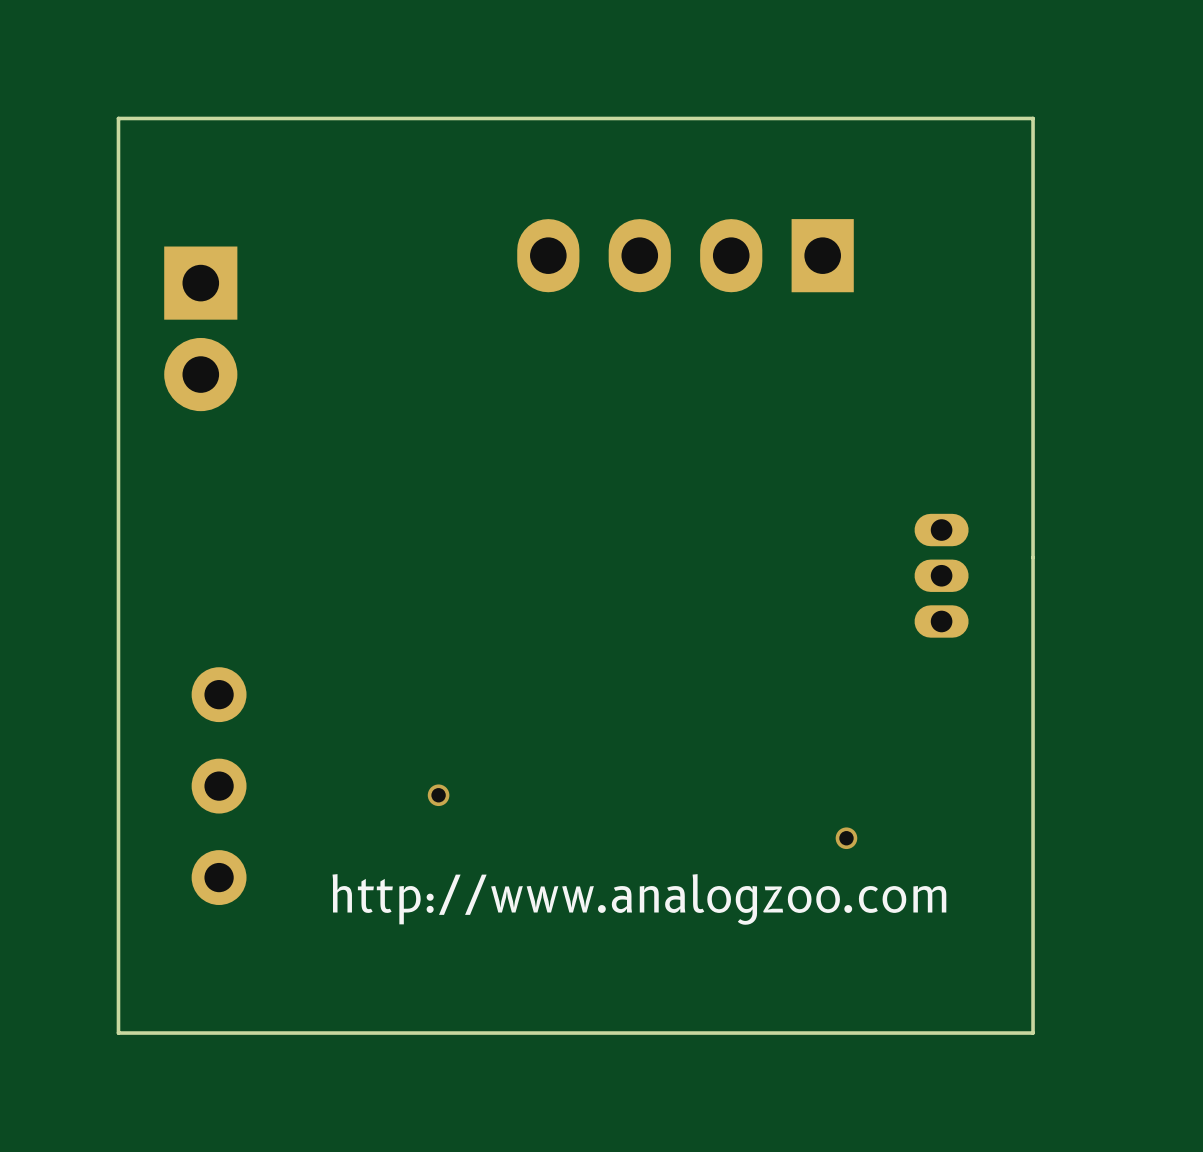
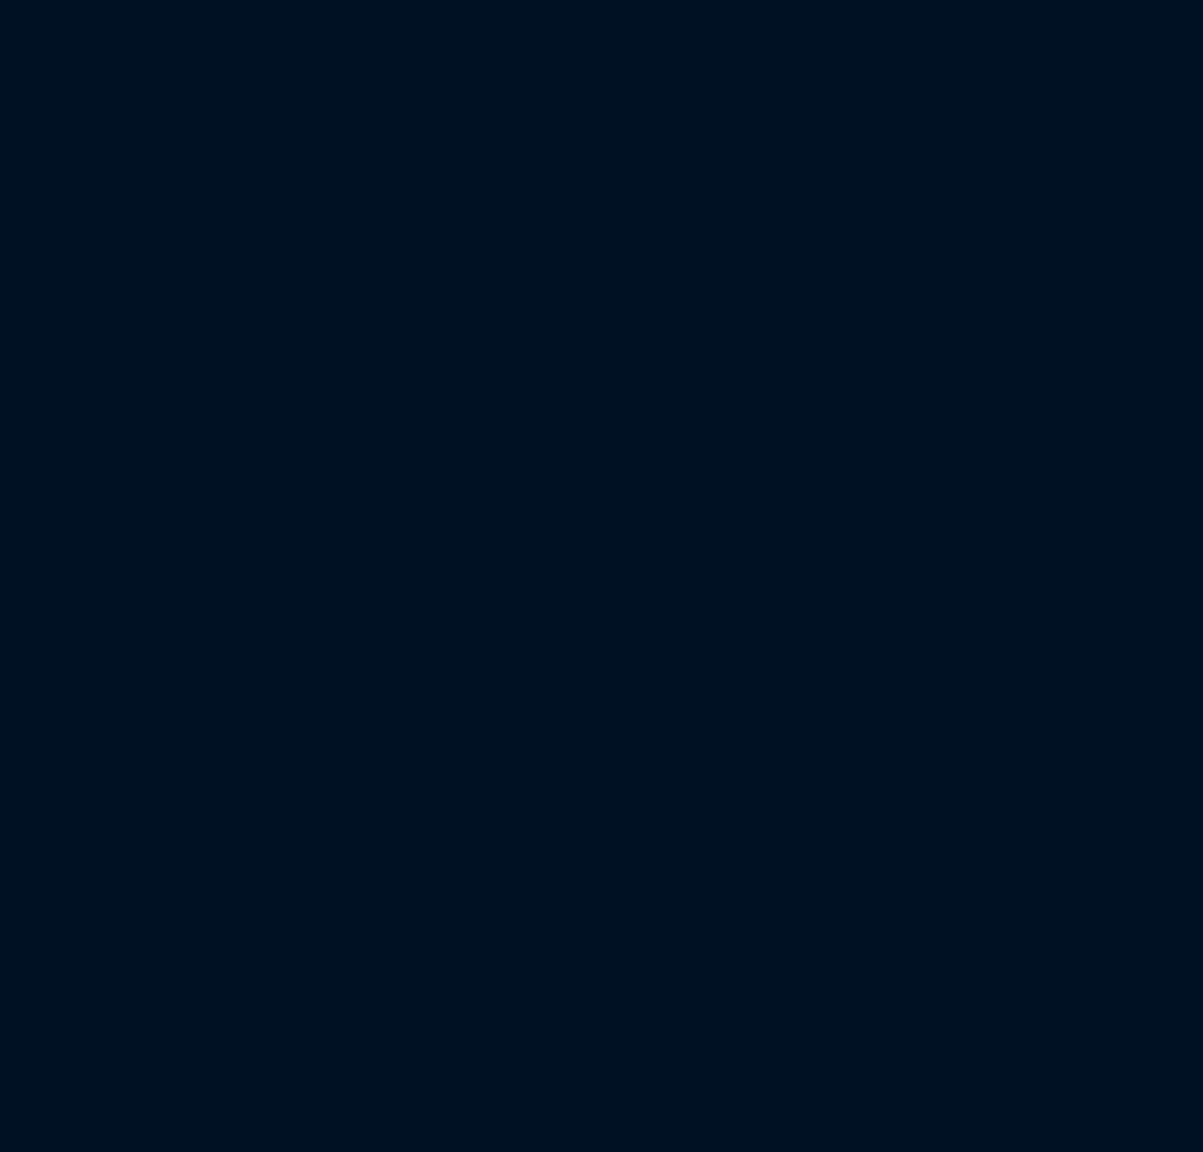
board edge: (1033, 118) (1033, 1033) (118, 1033) (118, 118) (1033, 118) -> none
part: (685, 255) -> none
part: (200, 328) -> none
part: (941, 575) -> none
part: (219, 786) -> none
via: (438, 795) -> none
via: (846, 838) -> none
text: http://www.analogzoo.com (639, 899) -> none

